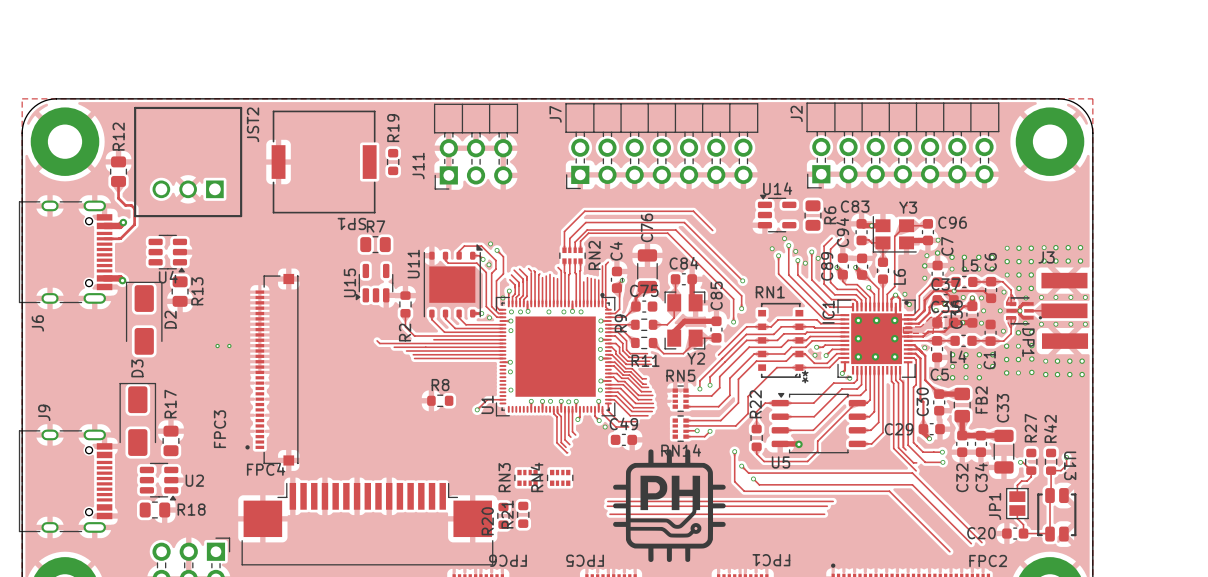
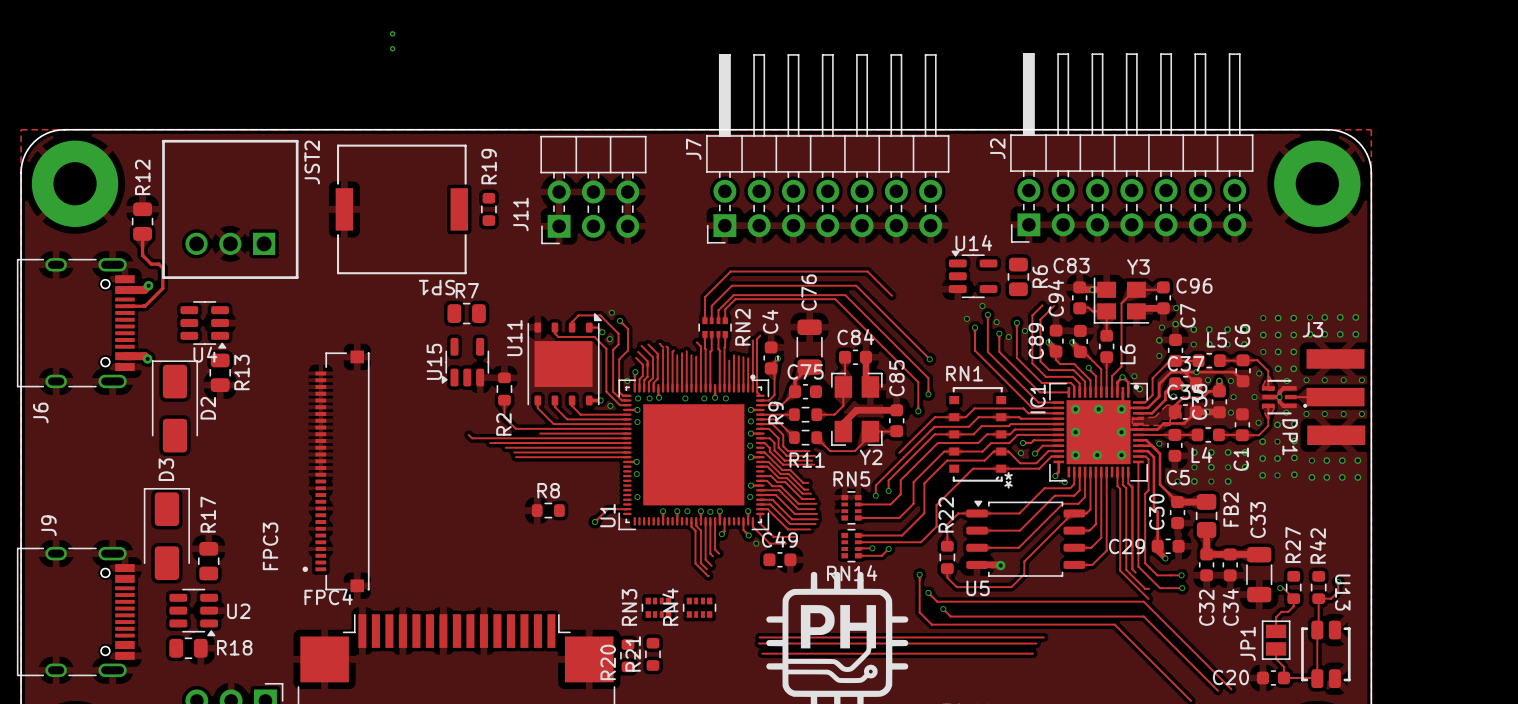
part: none -> (392, 41)
J2 footprint: [806, 102, 1000, 189] -> [1010, 53, 1254, 243]
J7 footprint: [565, 103, 759, 190] -> [706, 54, 950, 244]
part: (223, 346) -> none

